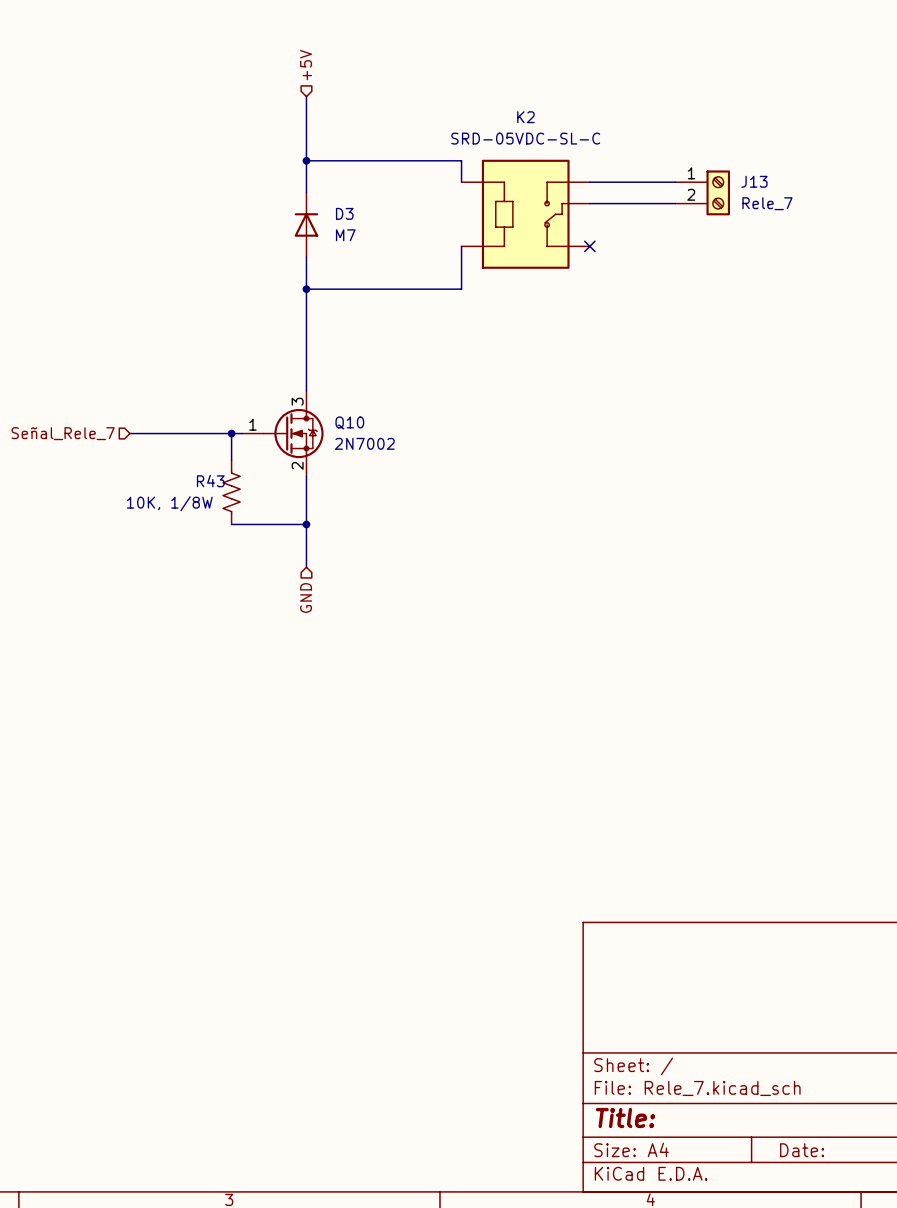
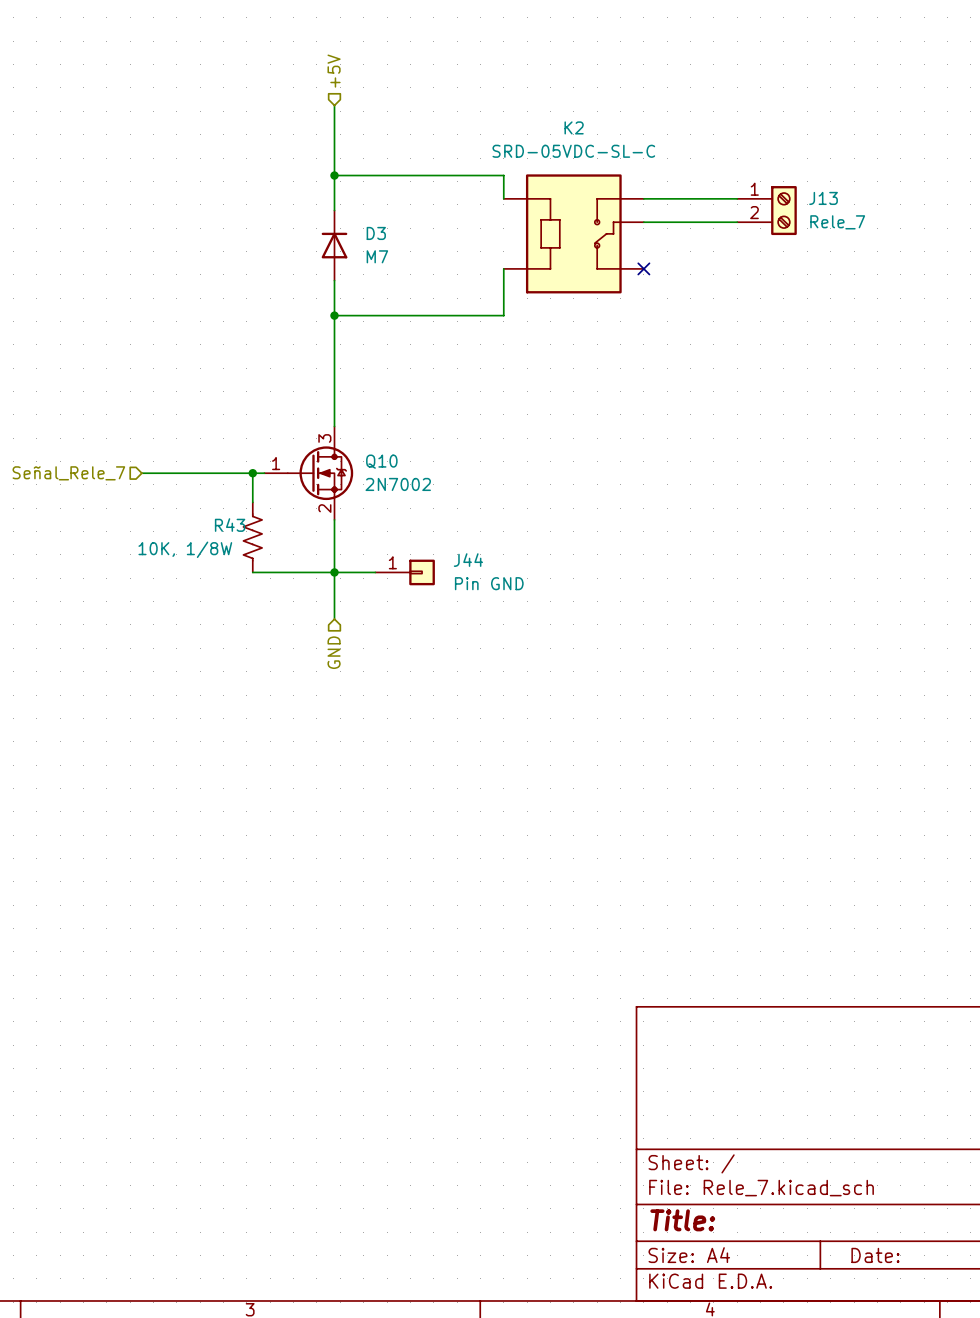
wire: none -> (334, 572) (375, 572)
J44: none -> Pin GND (405, 572)

